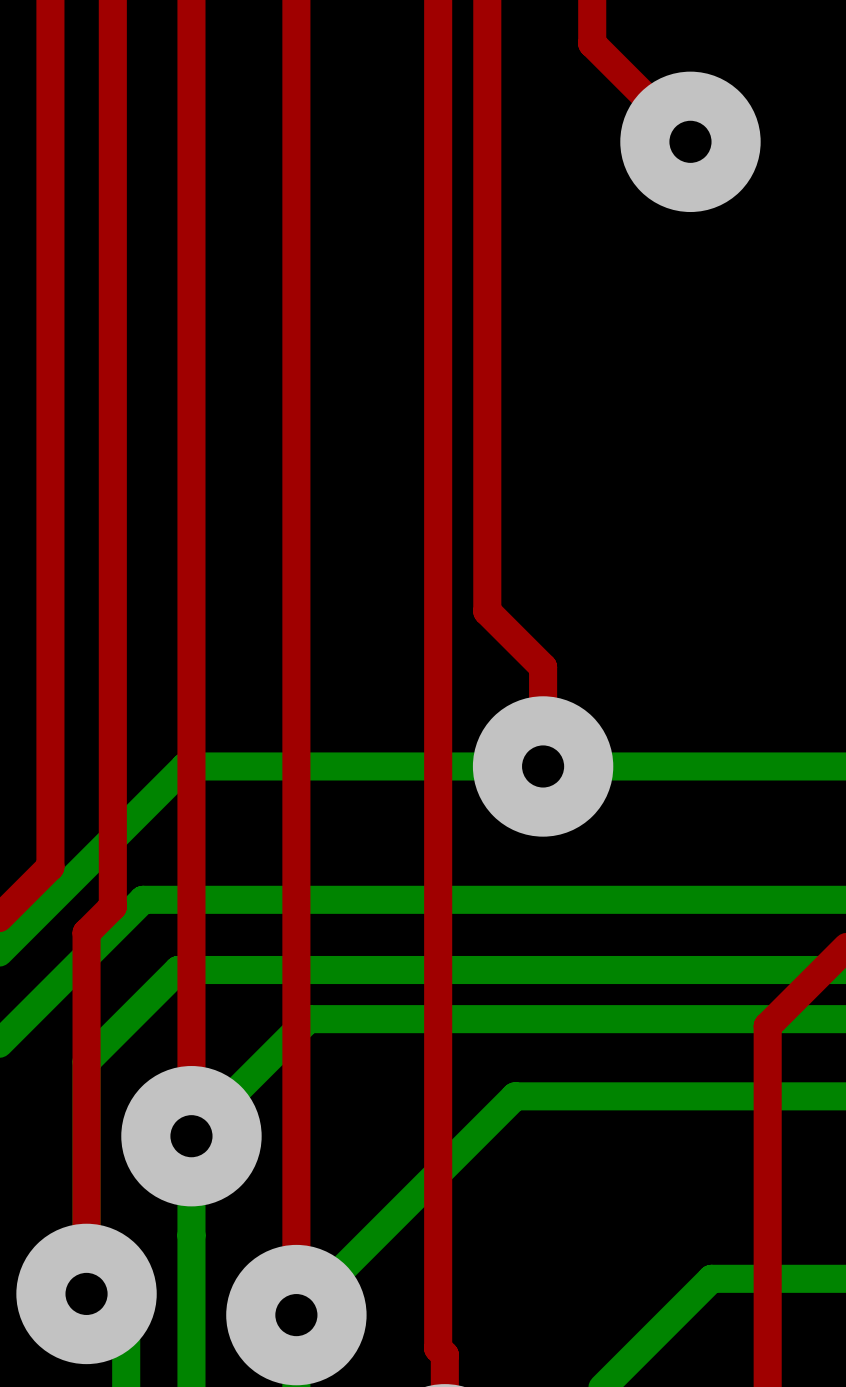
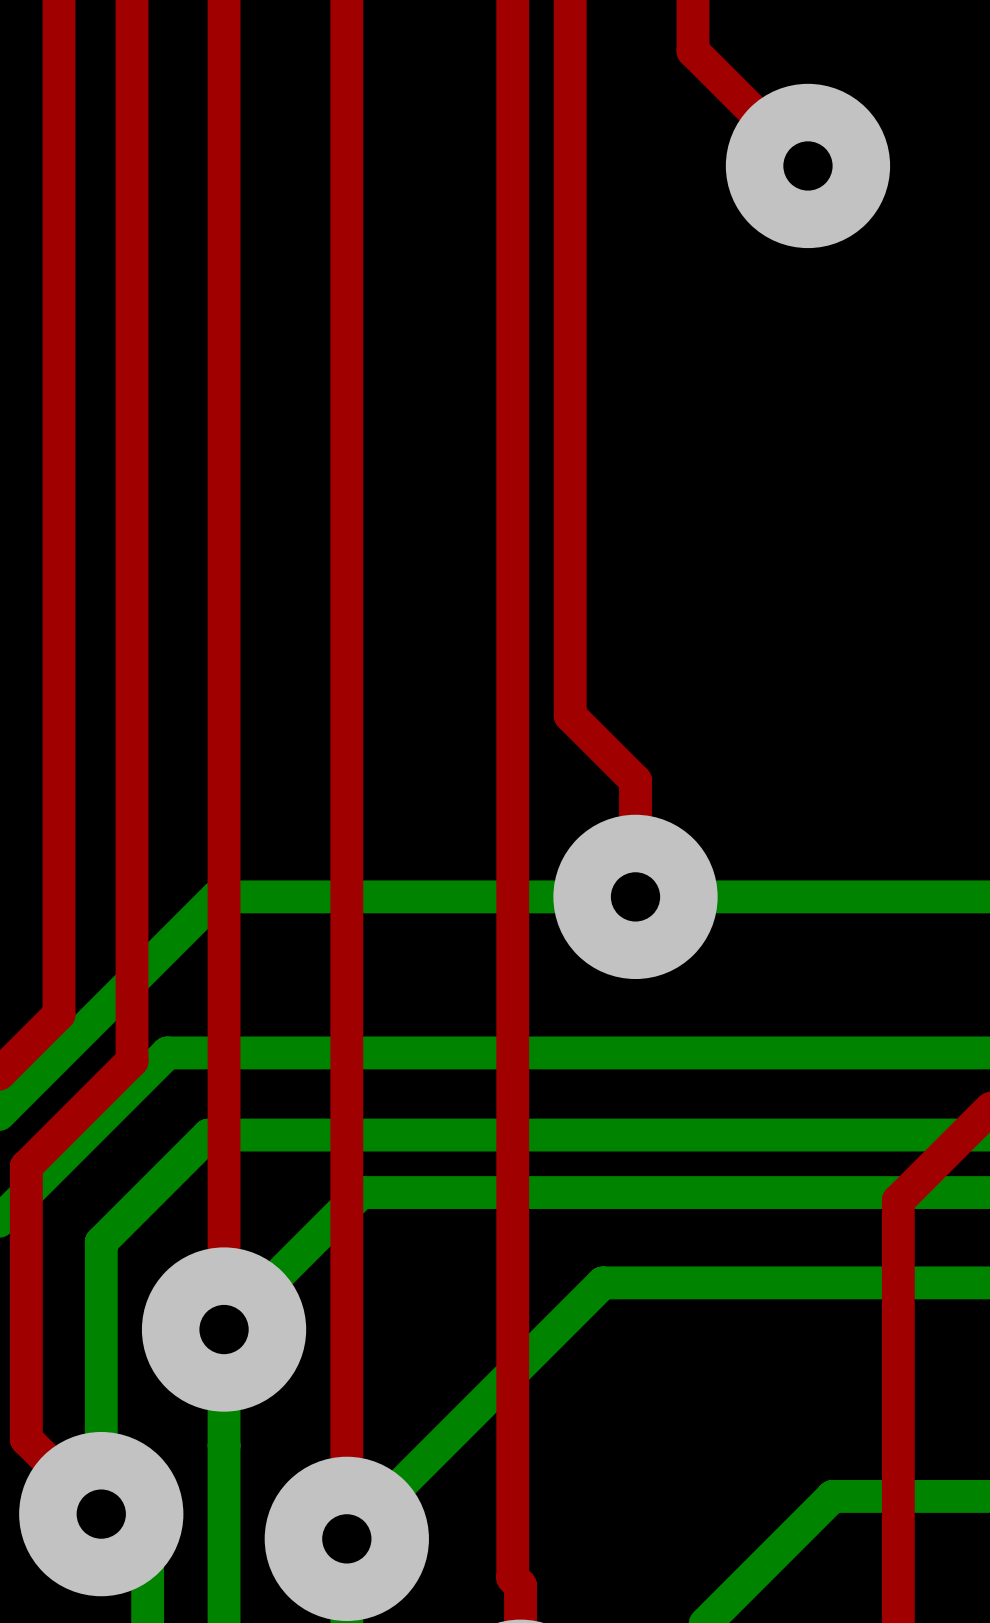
top track: (86, 932) (86, 1293) -> (101, 1091) (26, 1166) (26, 1439) (101, 1514)

